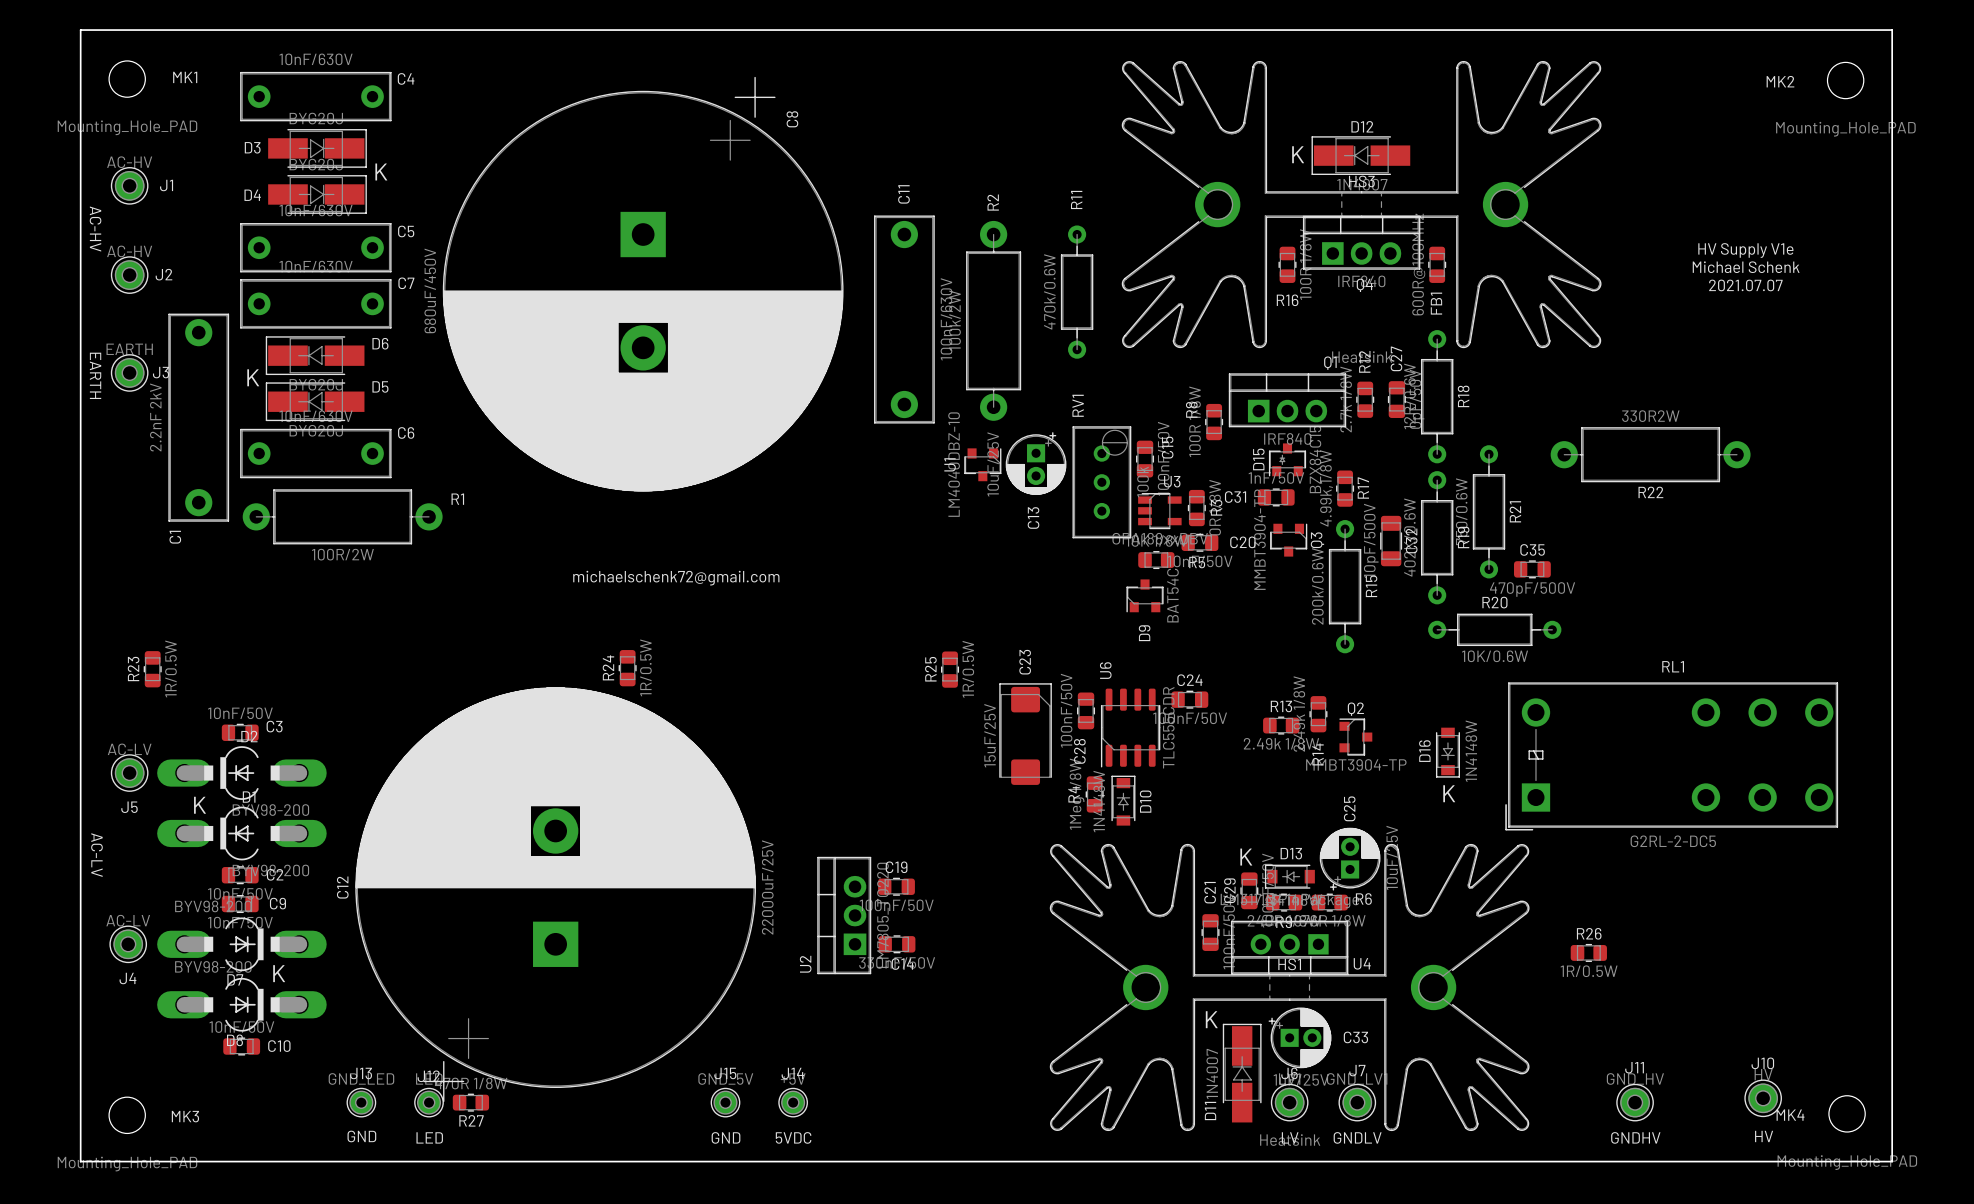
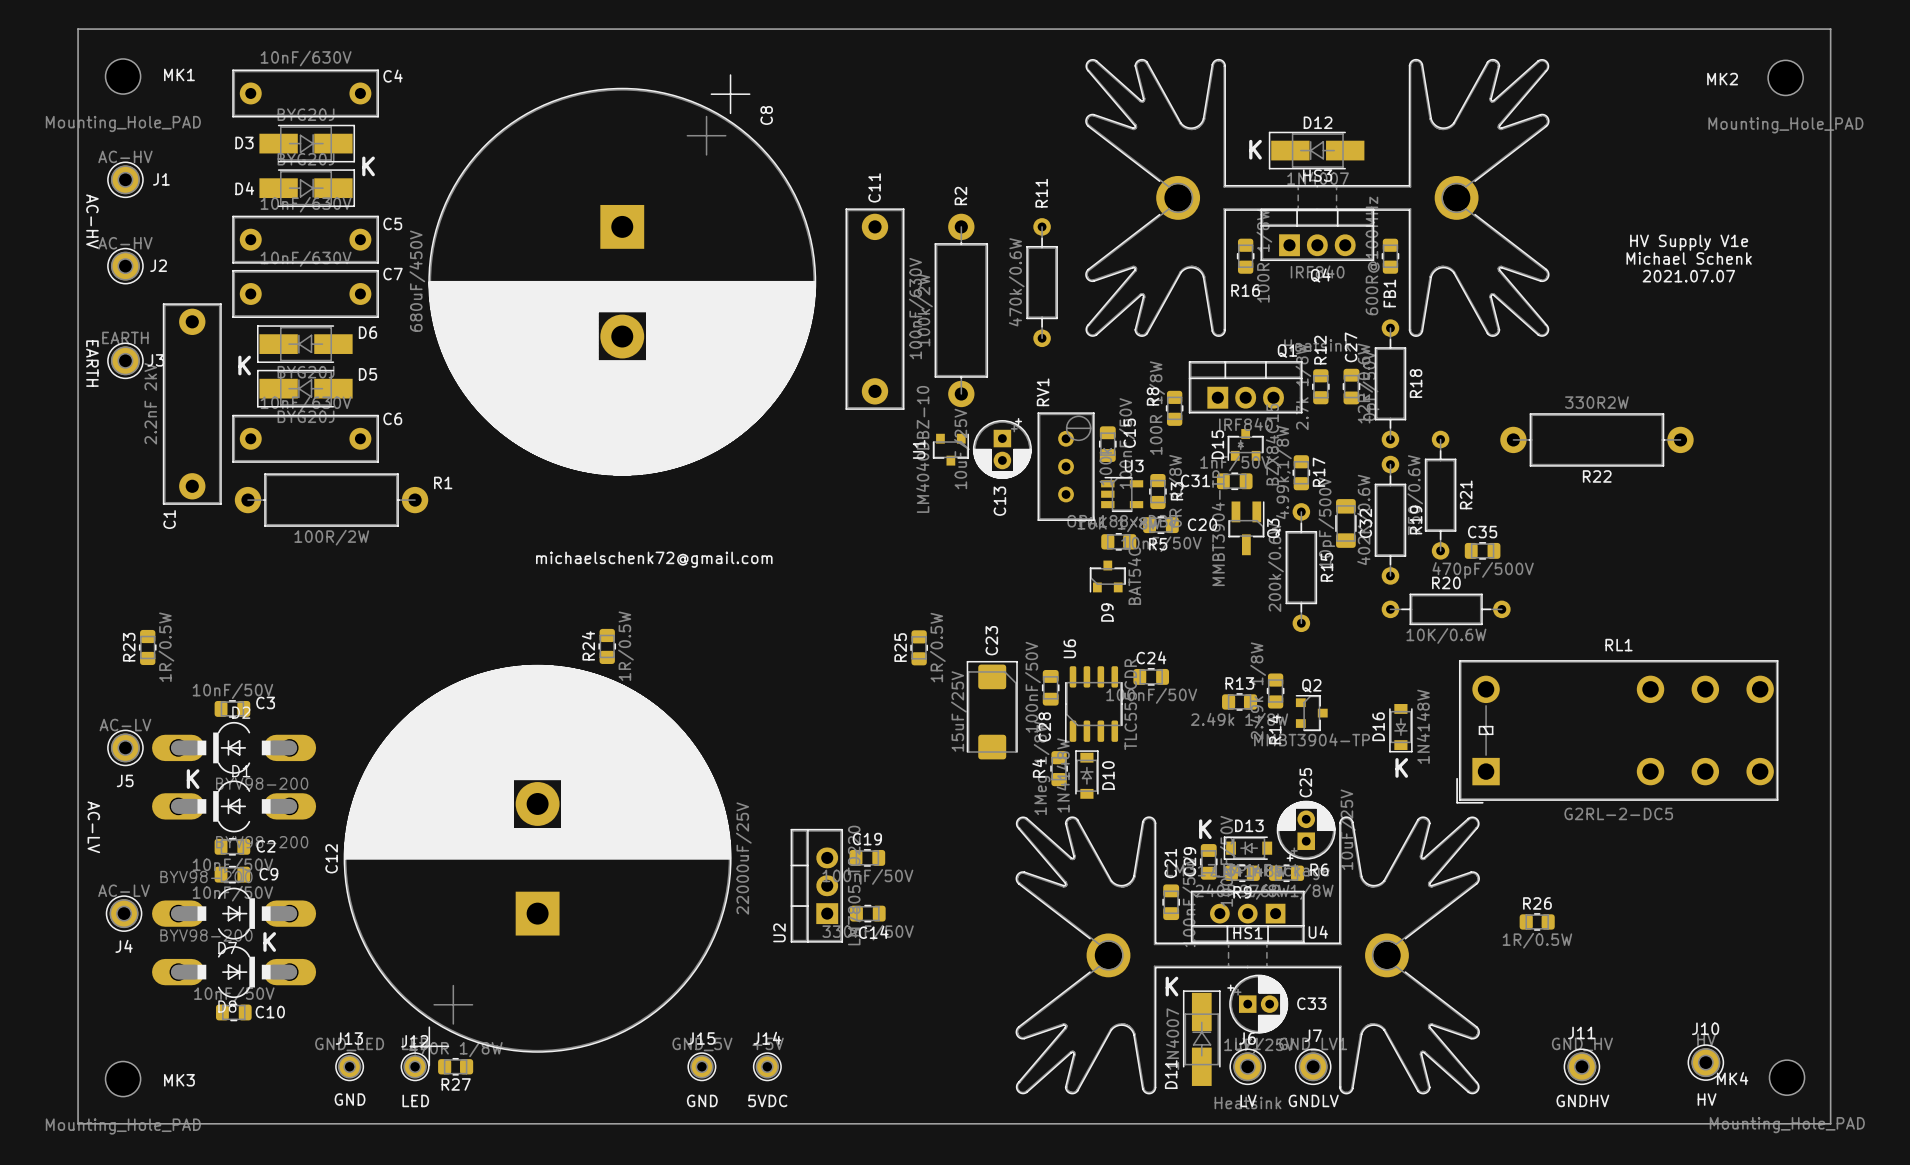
Q3 footprint: [1270, 523, 1308, 557] -> [1228, 501, 1265, 556]

